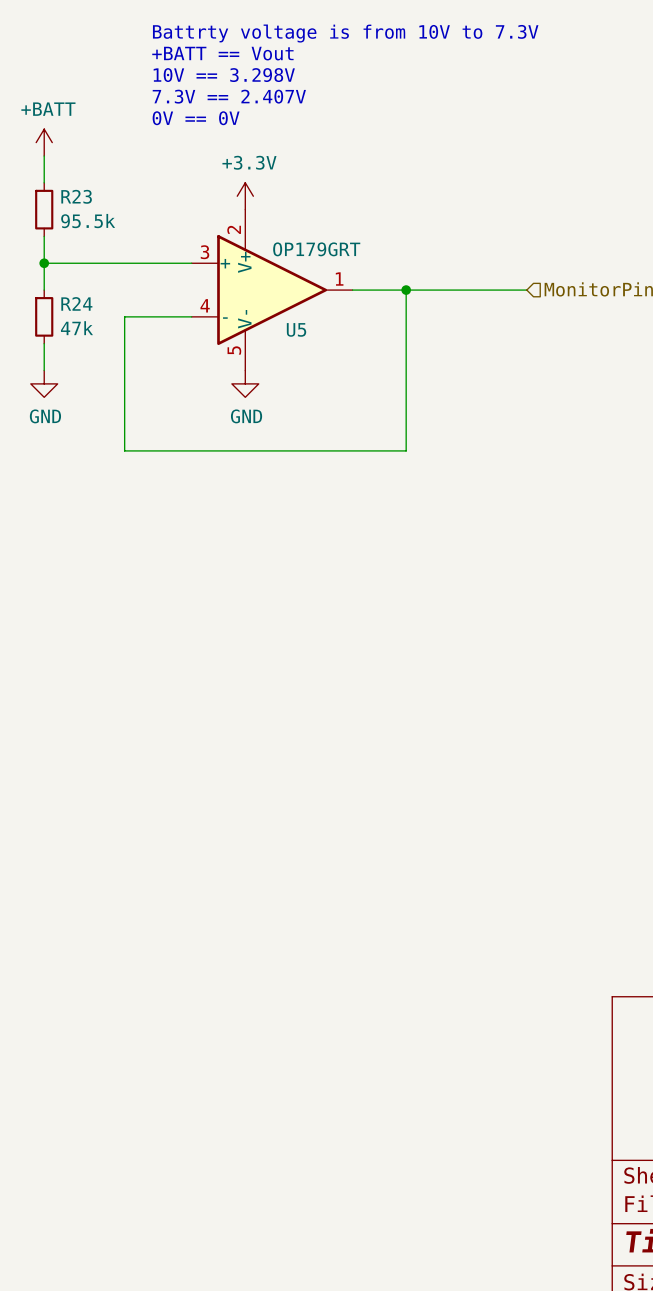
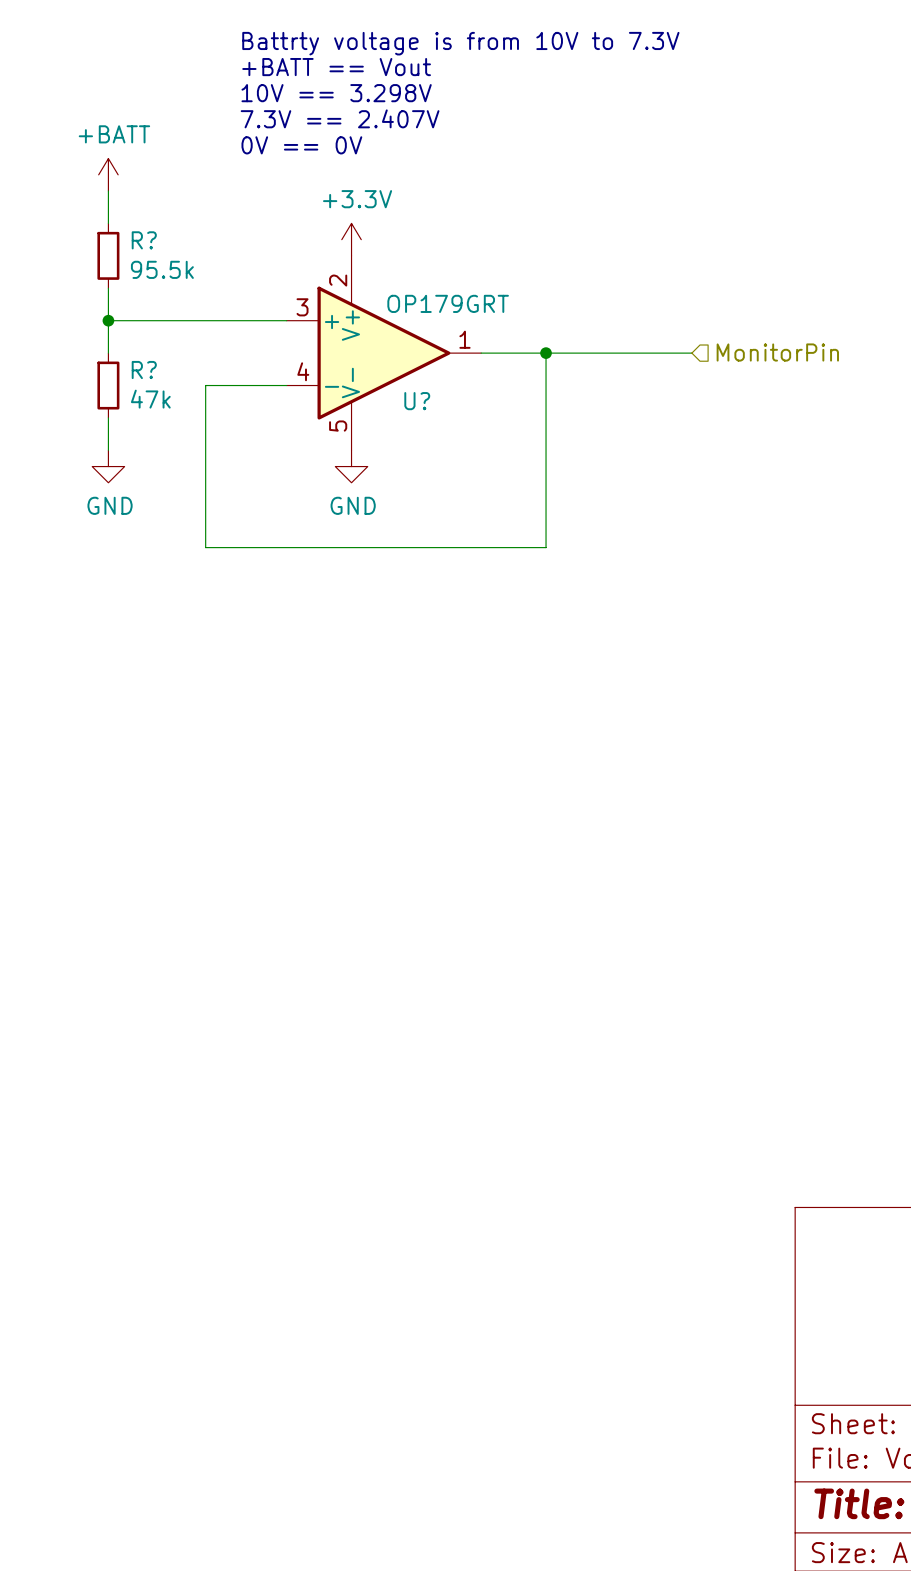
R23 name: R23 (76, 196) -> R? (144, 240)
R24 name: R24 (76, 303) -> R? (144, 370)
U5 name: U5 (296, 329) -> U? (417, 401)

